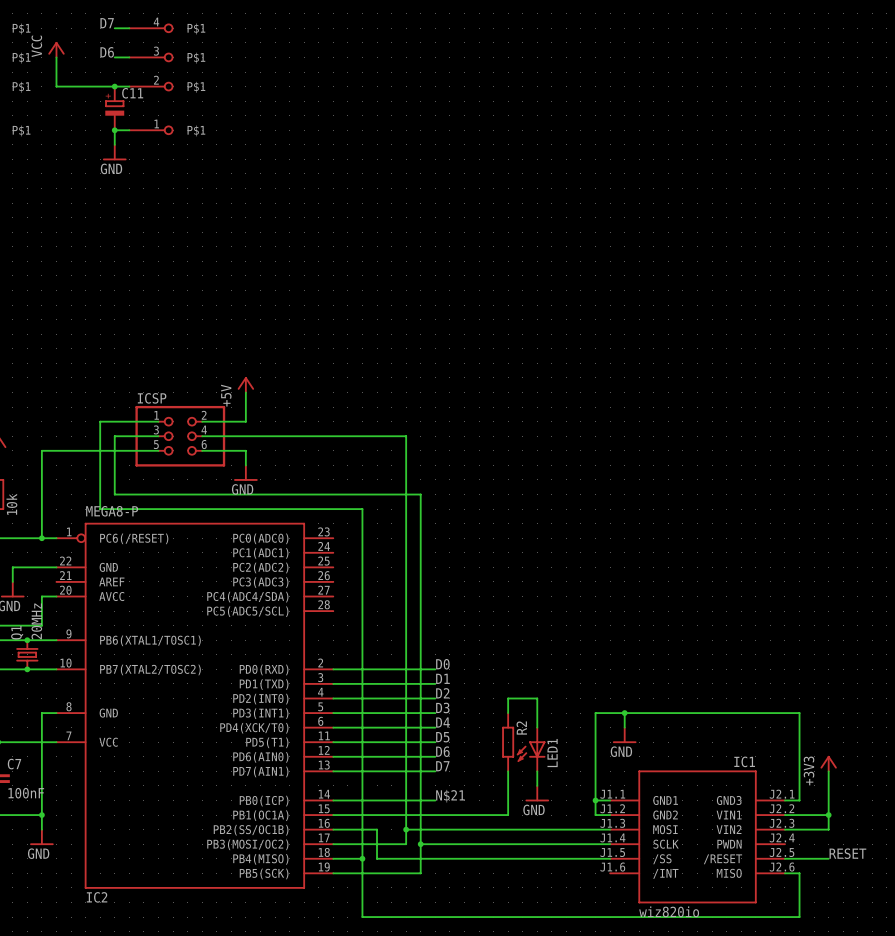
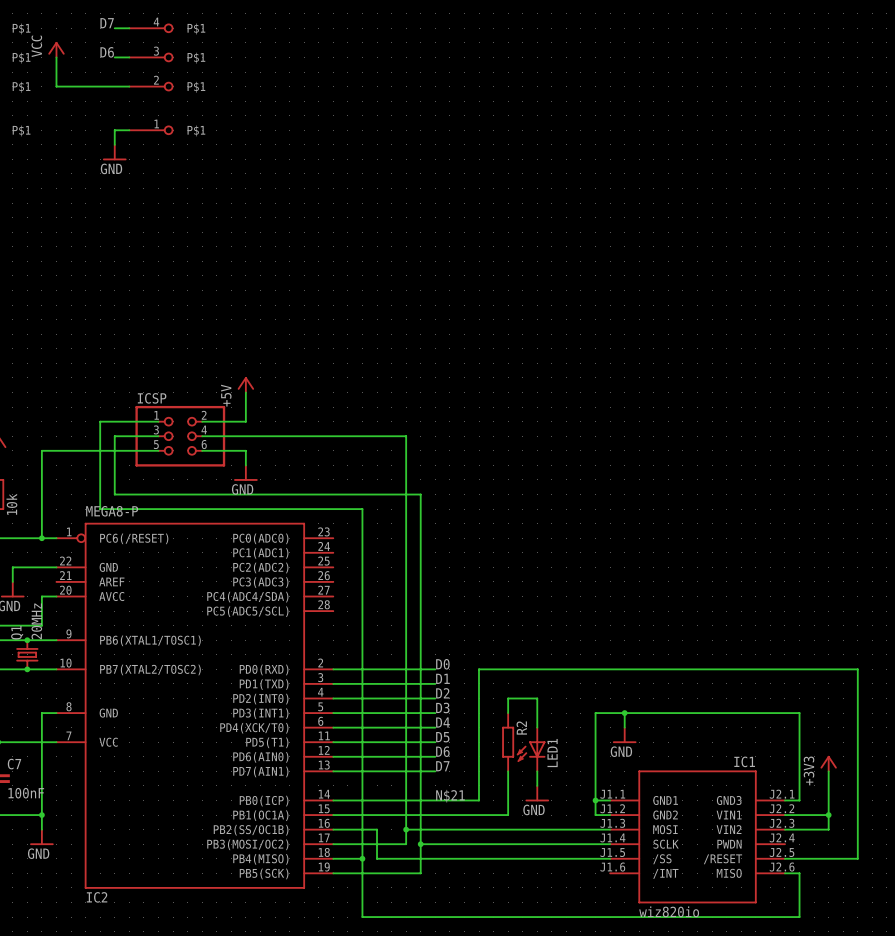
junction: (114, 86) -> none
C11: (114, 108) -> none
junction: (114, 130) -> none
wire: none -> (435, 800) (479, 800) (479, 669) (857, 669) (857, 858) (828, 858)
label: RESET (847, 853) -> none

